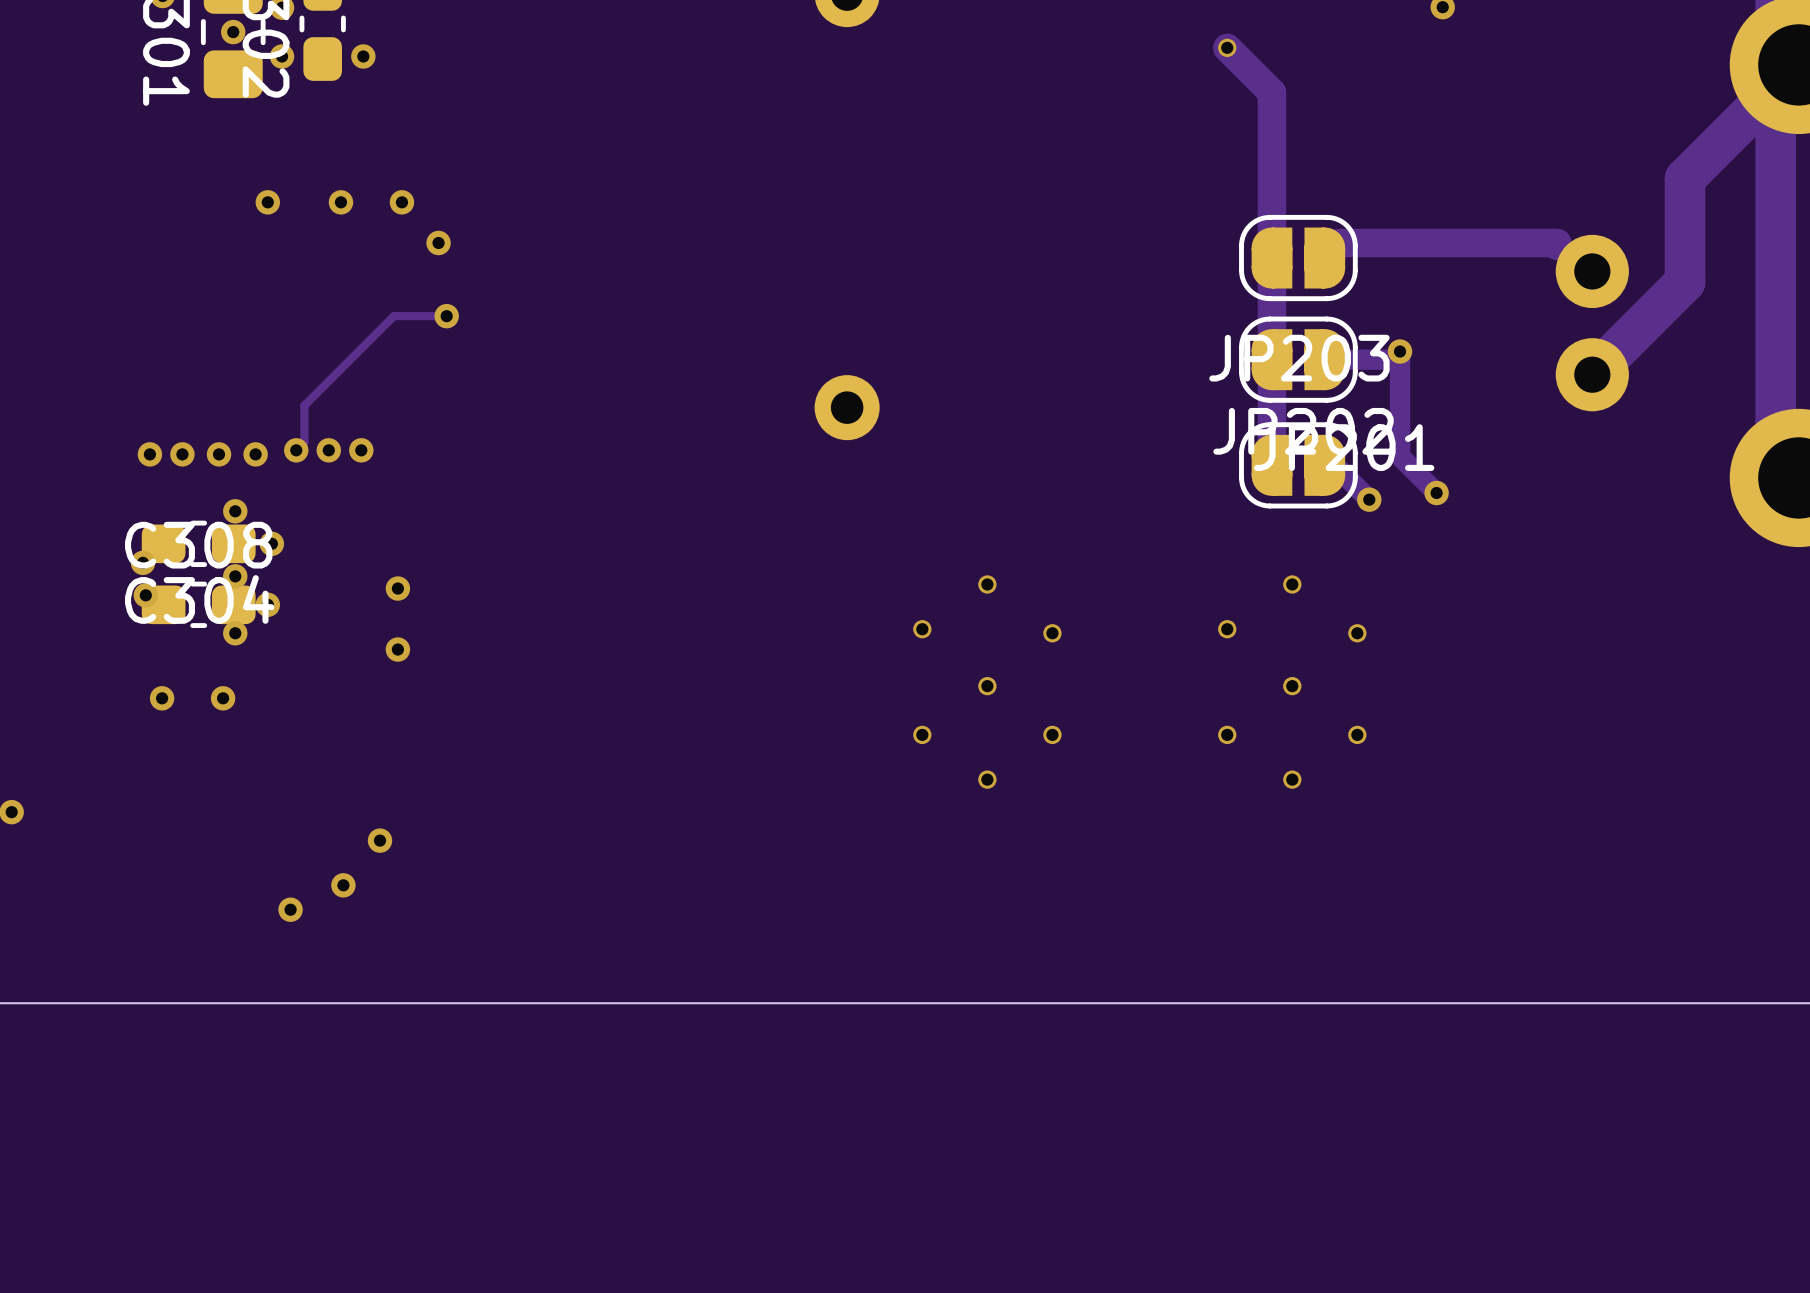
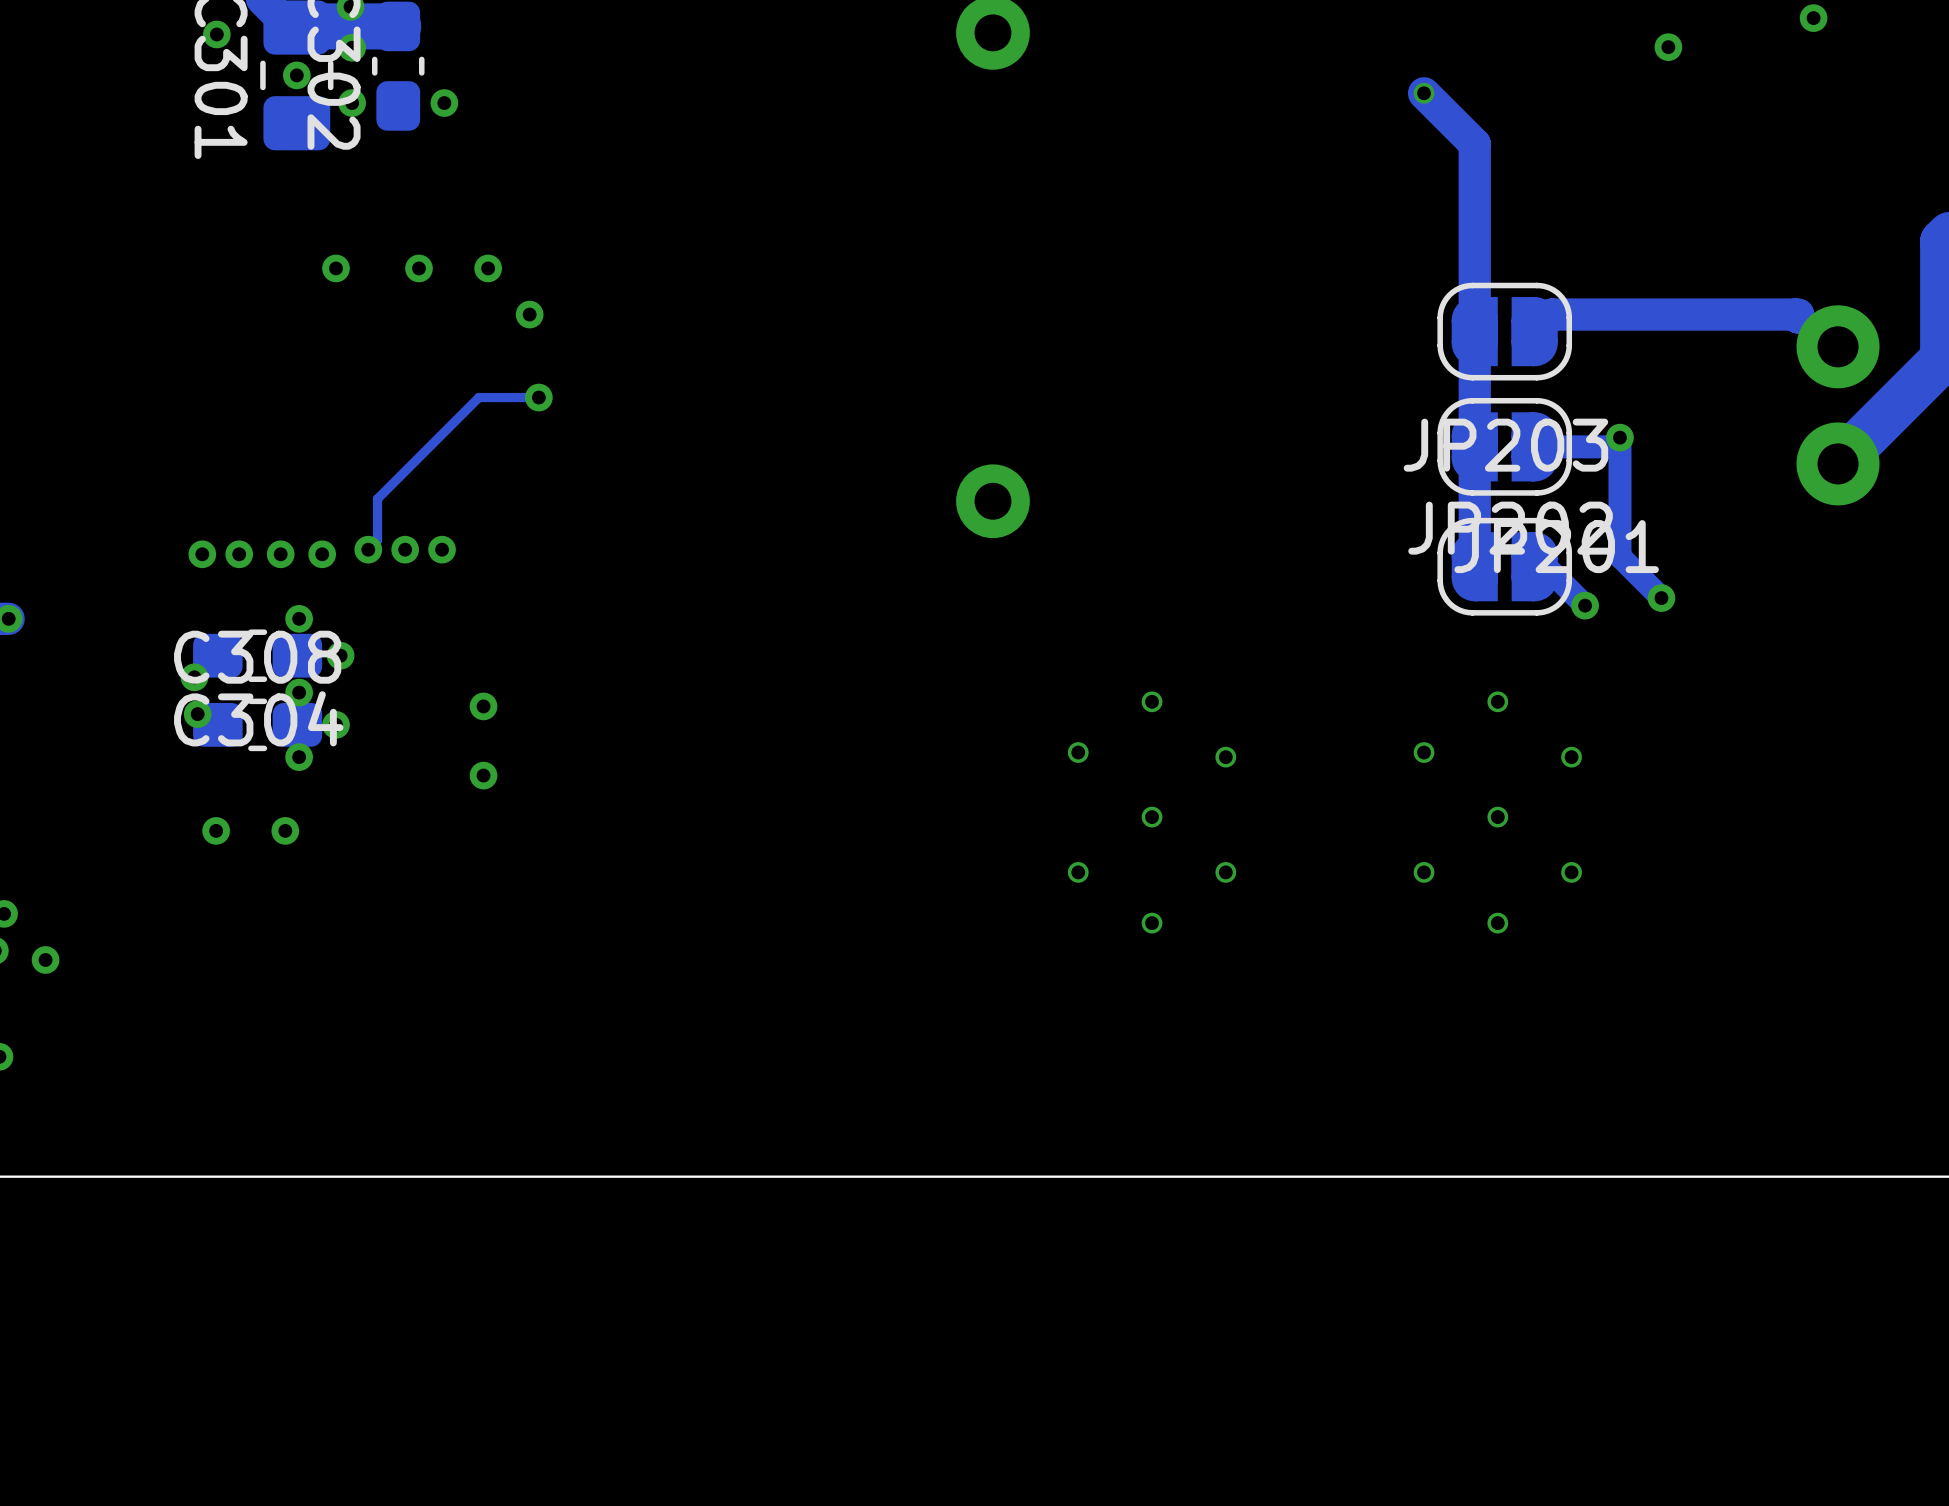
via: (380, 840) -> none
via: (343, 885) -> none
via: (290, 909) -> none

